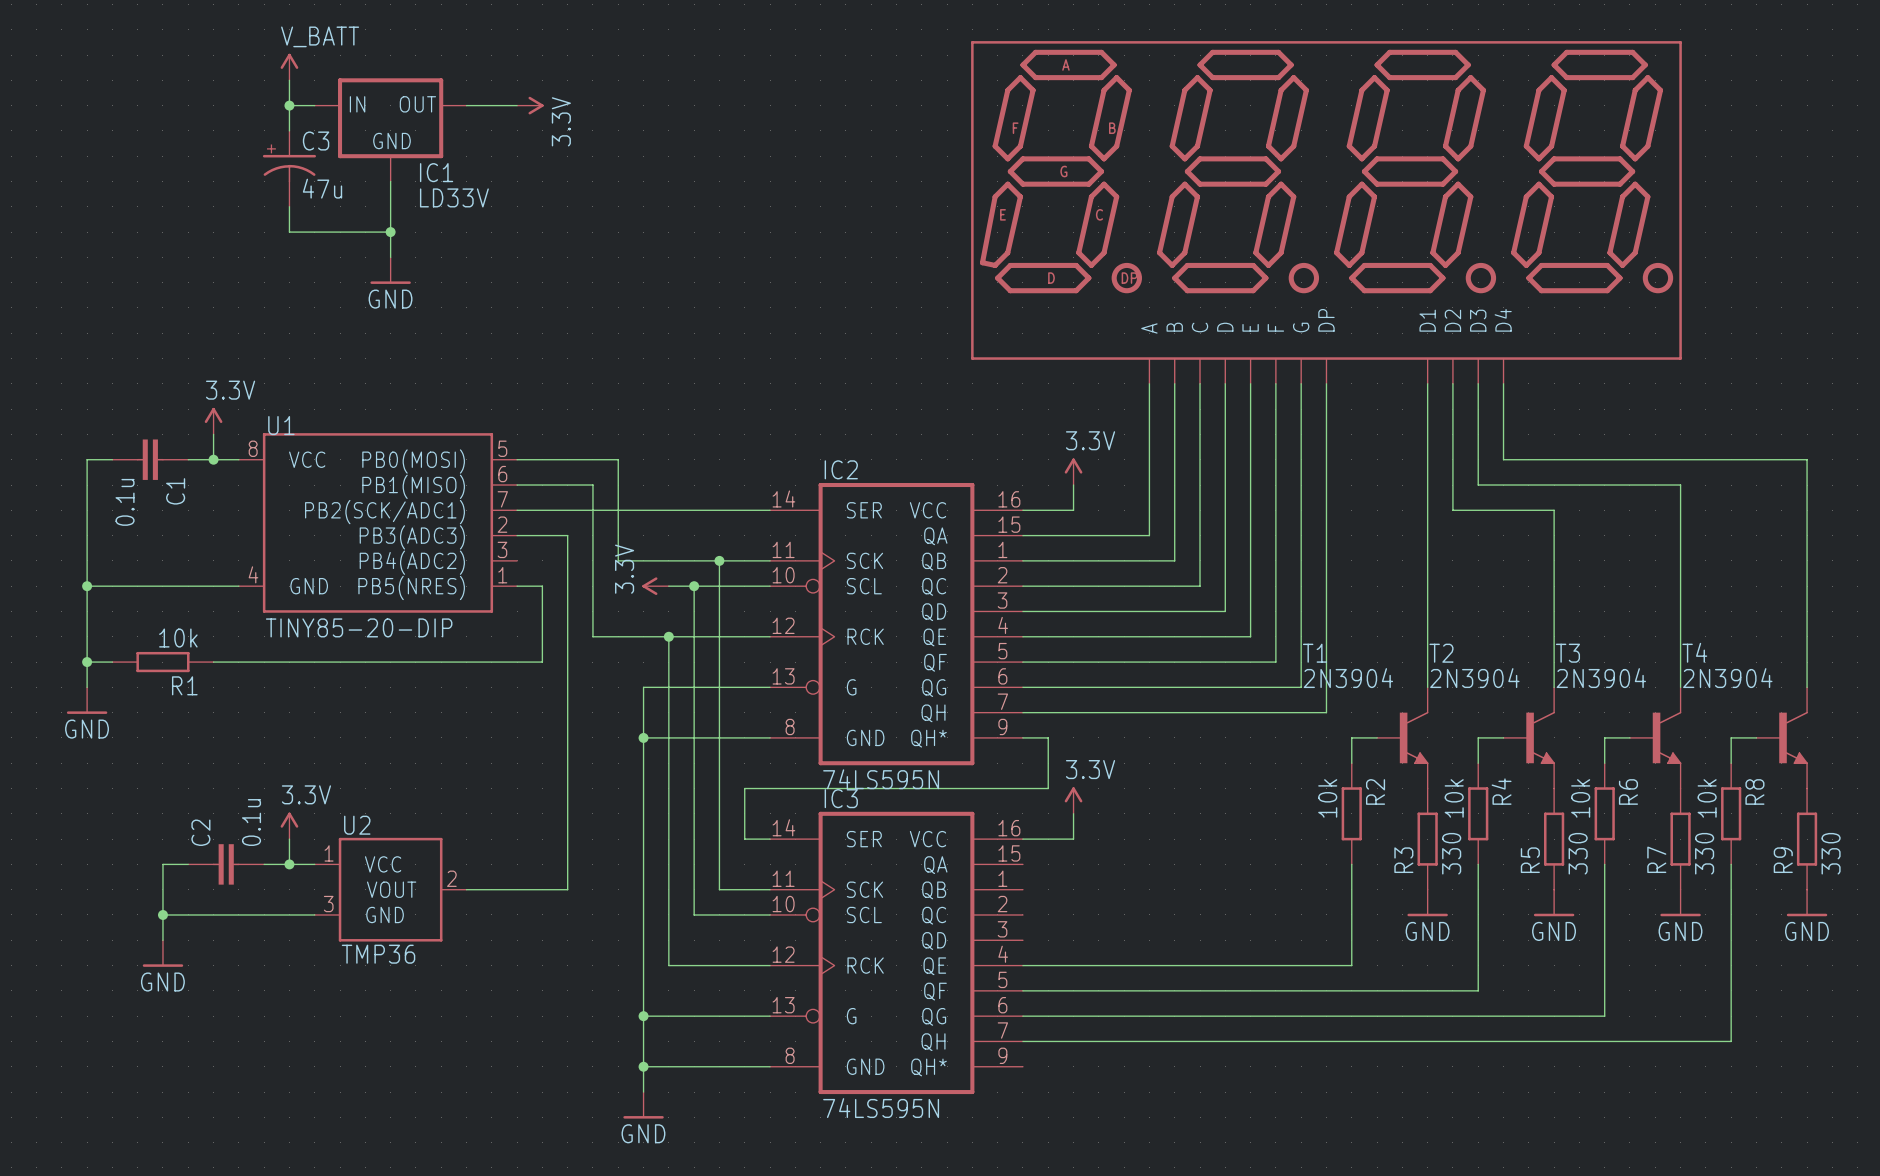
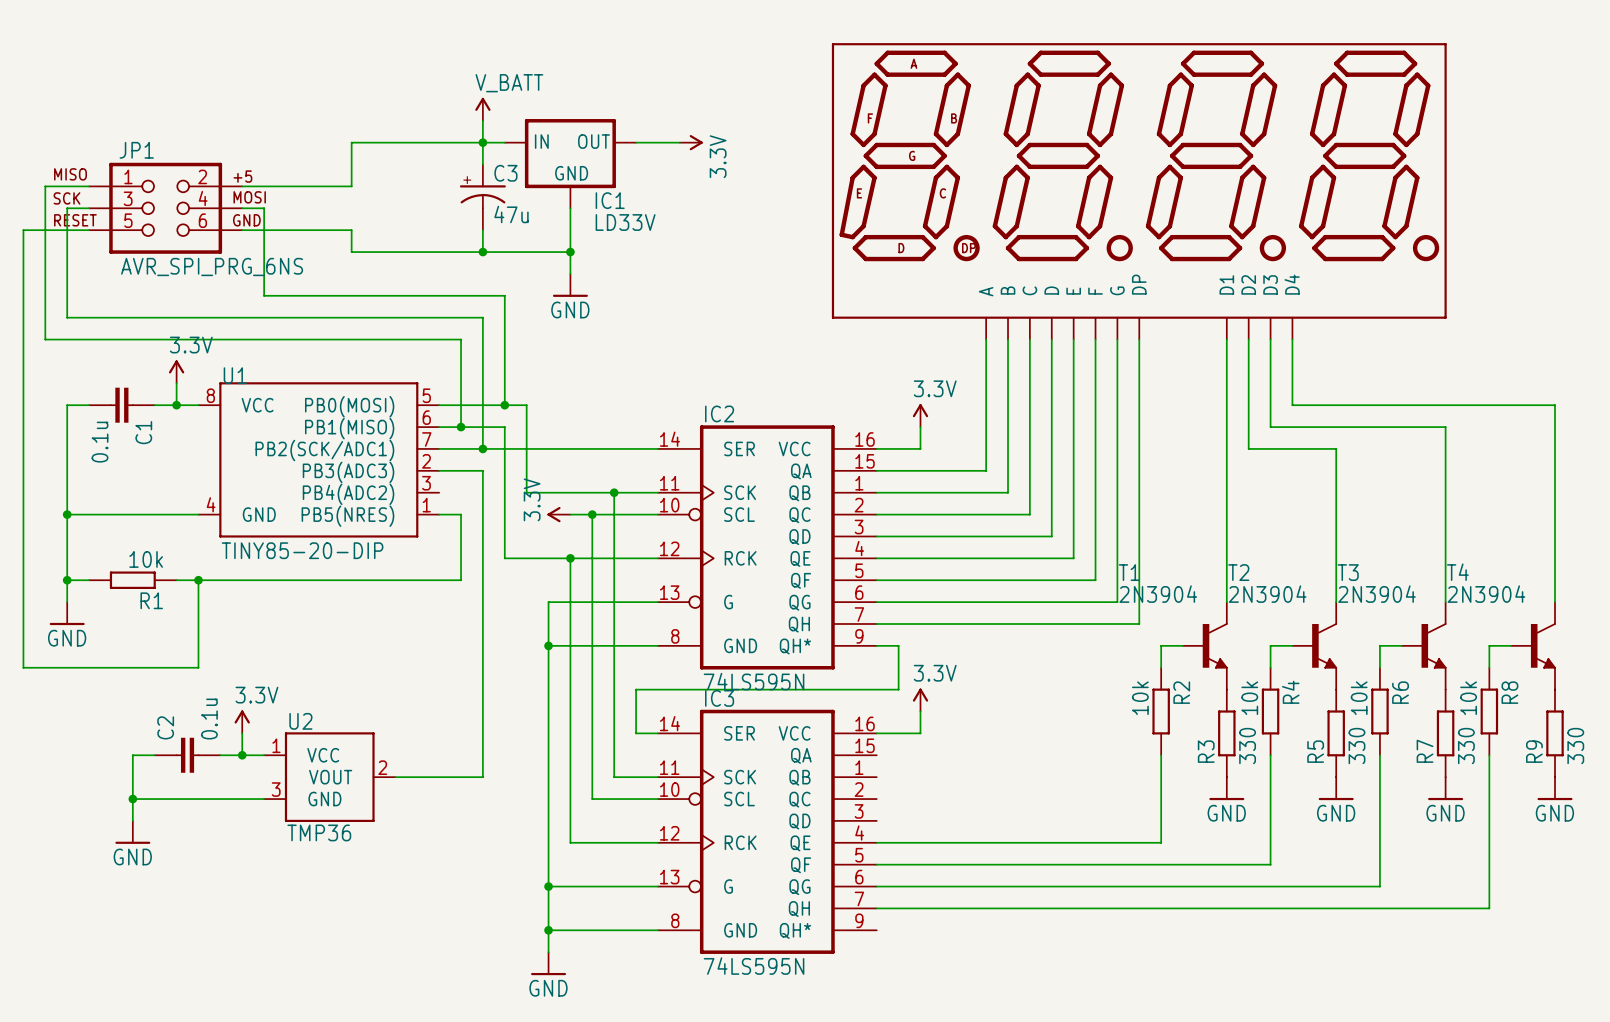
power symbol: V_BATT (289, 67) -> none
wire: (289, 80) (289, 130) -> none
wire: (289, 105) (314, 105) -> none
junction: (289, 105) -> none
wire: (466, 105) (517, 105) -> none
power symbol: 3.3V (530, 105) -> none
power symbol: none -> V_BATT (482, 109)
IC1 position: (390, 129) -> (570, 163)
wire: none -> (482, 120) (482, 164)
junction: none -> (482, 142)
wire: none -> (636, 142) (679, 142)
power symbol: none -> 3.3V (691, 142)
C3 position: (289, 168) -> (482, 197)
wire: (390, 181) (390, 257) -> none
wire: none -> (89, 186) (45, 186) (45, 339) (461, 339) (461, 427)
wire: (289, 206) (289, 232) -> (242, 186) (351, 186) (351, 142) (504, 142)
wire: none -> (89, 208) (67, 208) (67, 317) (482, 317) (482, 448)
JP1: none -> AVR_SPI_PRG_6NS (165, 208)
wire: (314, 232) (390, 232) -> (264, 208) (264, 295) (504, 295) (504, 405)
junction: (390, 232) -> none
wire: none -> (570, 208) (570, 273)
wire: none -> (89, 230) (23, 230) (23, 667) (198, 667) (198, 580)
wire: none -> (242, 230) (351, 230) (351, 252) (570, 252)
wire: none -> (482, 230) (482, 252)
power symbol: GND (390, 270) -> none
junction: none -> (482, 252)
junction: none -> (570, 252)
power symbol: none -> GND (570, 285)
junction: none -> (504, 405)
junction: none -> (461, 427)
junction: none -> (482, 448)
junction: none -> (198, 580)

